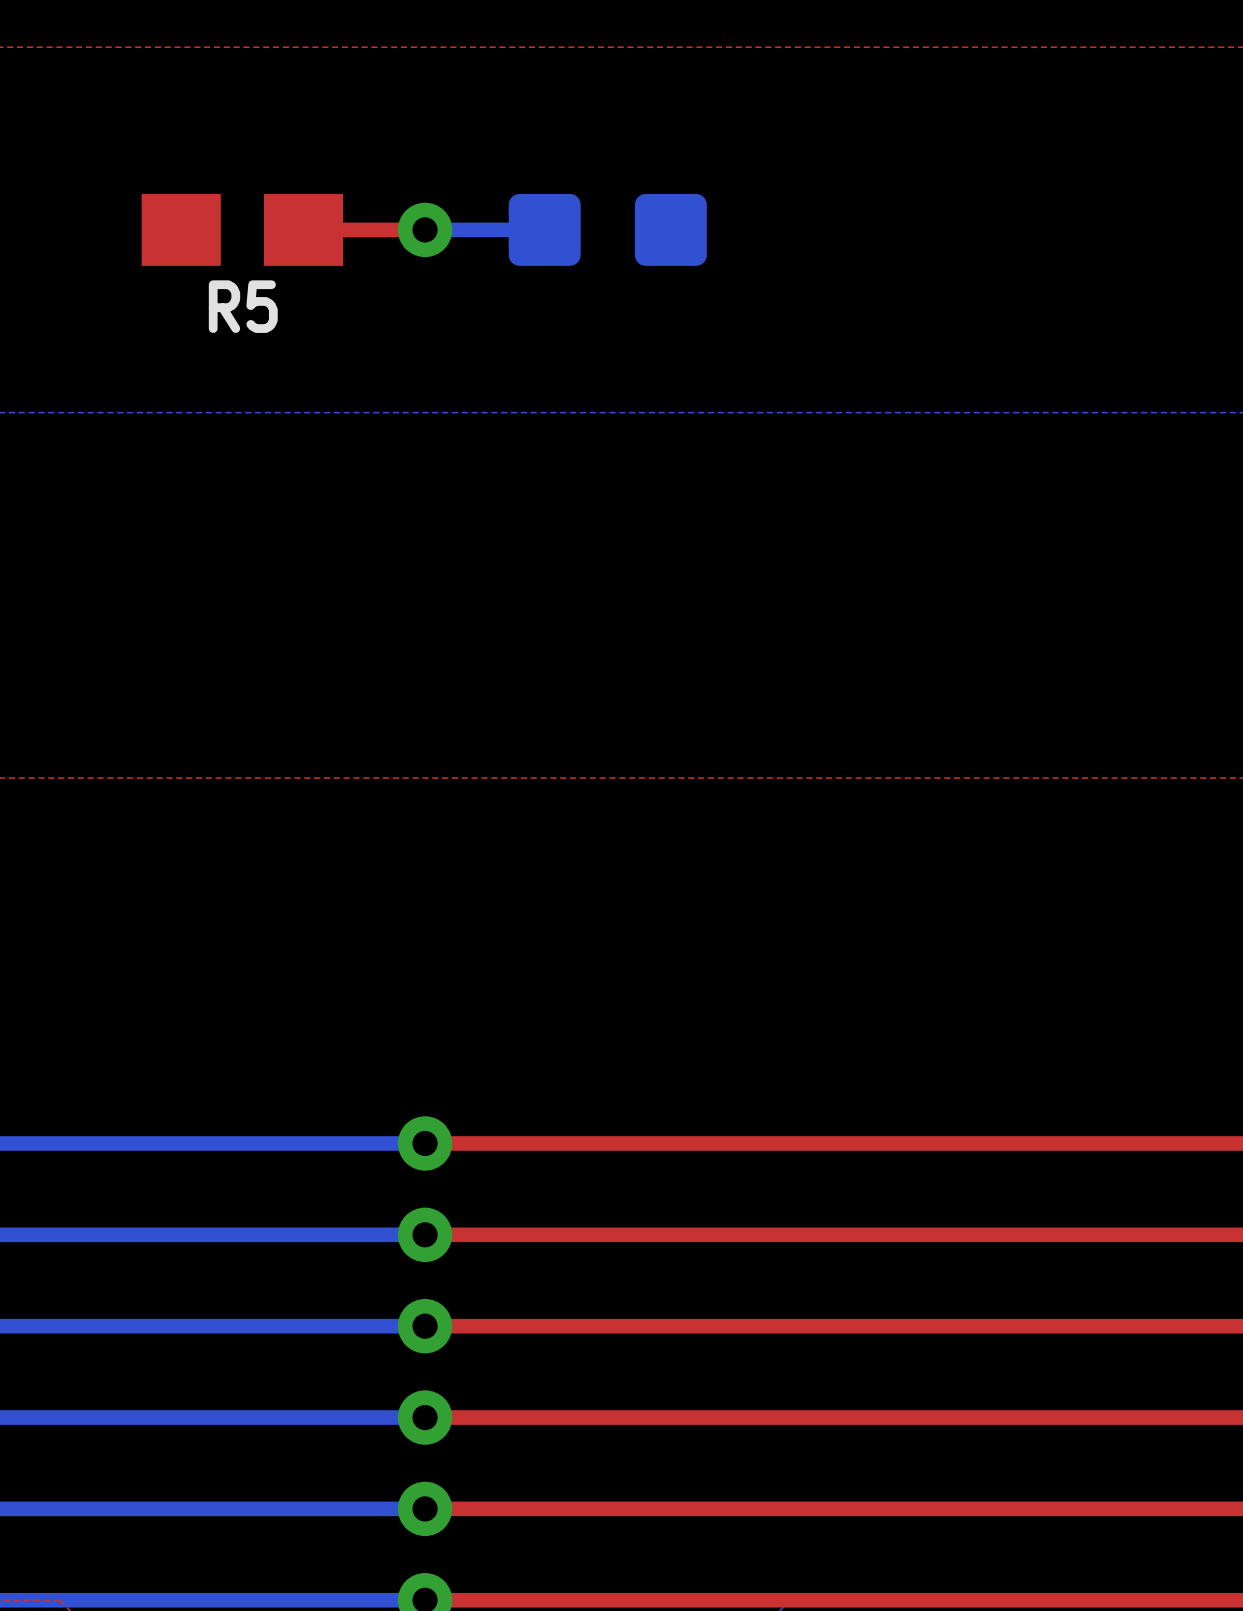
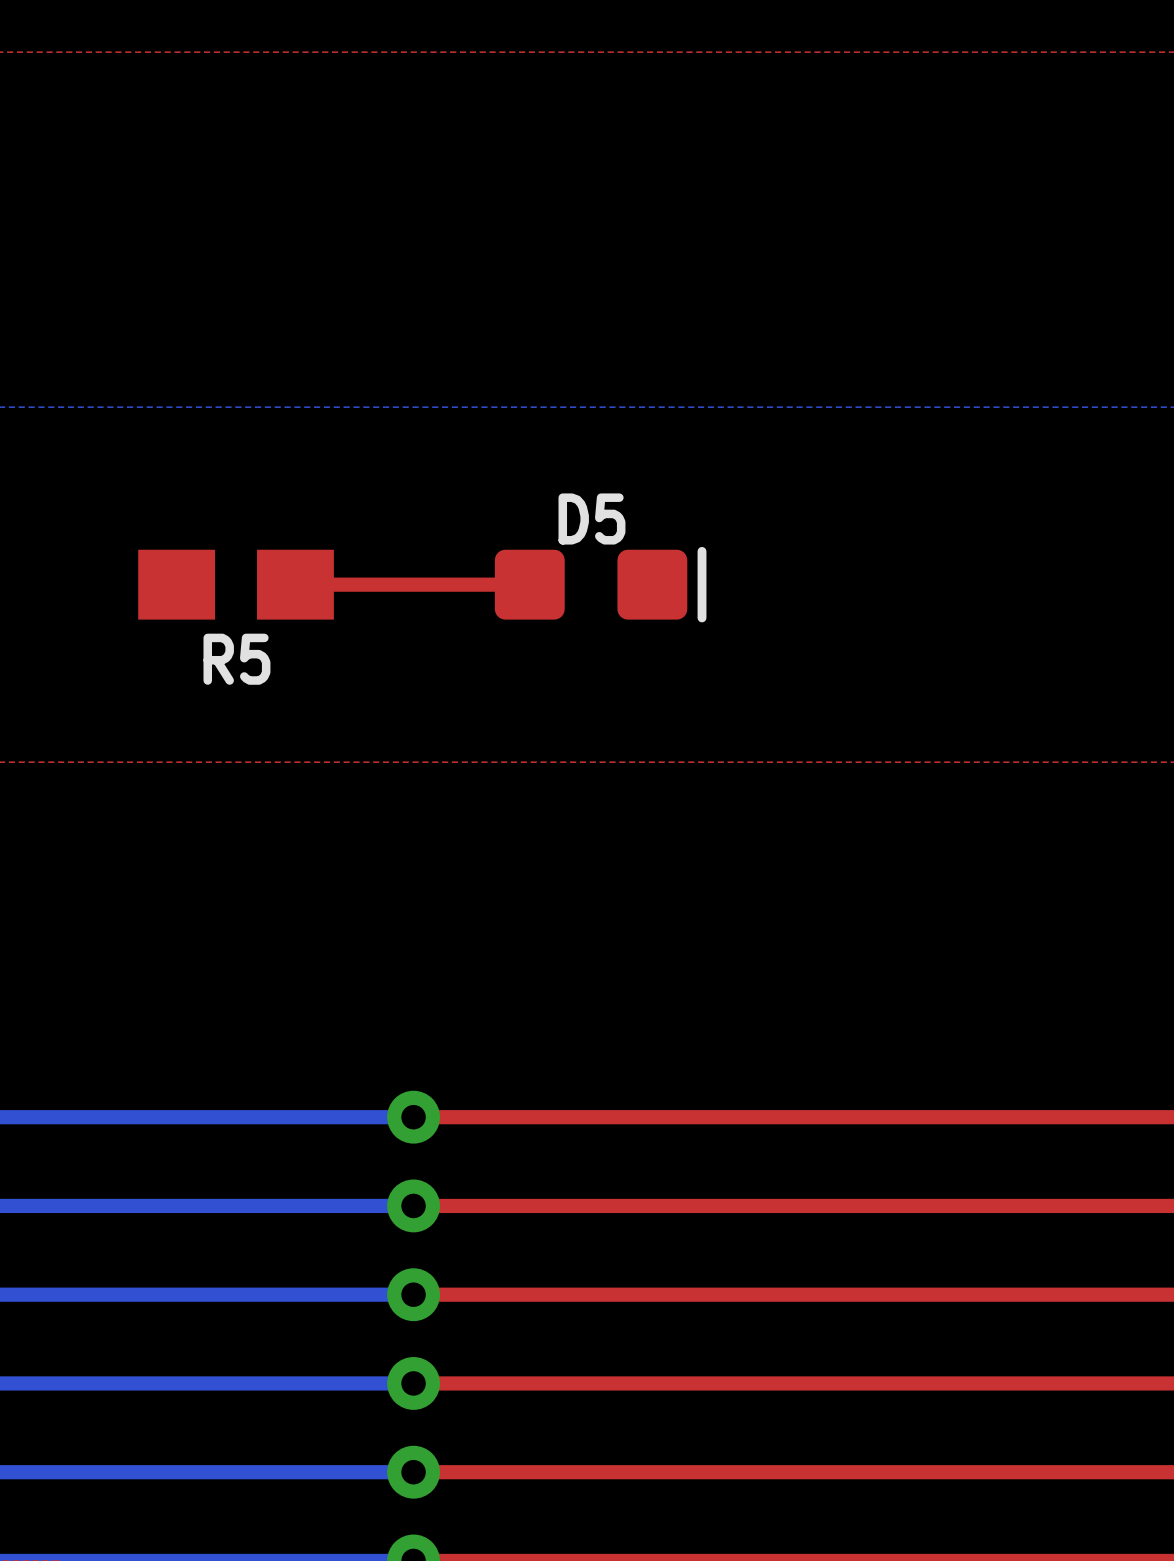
R5 position: (242, 229) -> (236, 584)
top track: (303, 229) (425, 229) -> none
bottom track: (425, 229) (544, 229) -> none
via: (425, 229) -> none
D5 side: bottom (607, 229) -> top (600, 584)
top track: none -> (295, 584) (529, 584)

